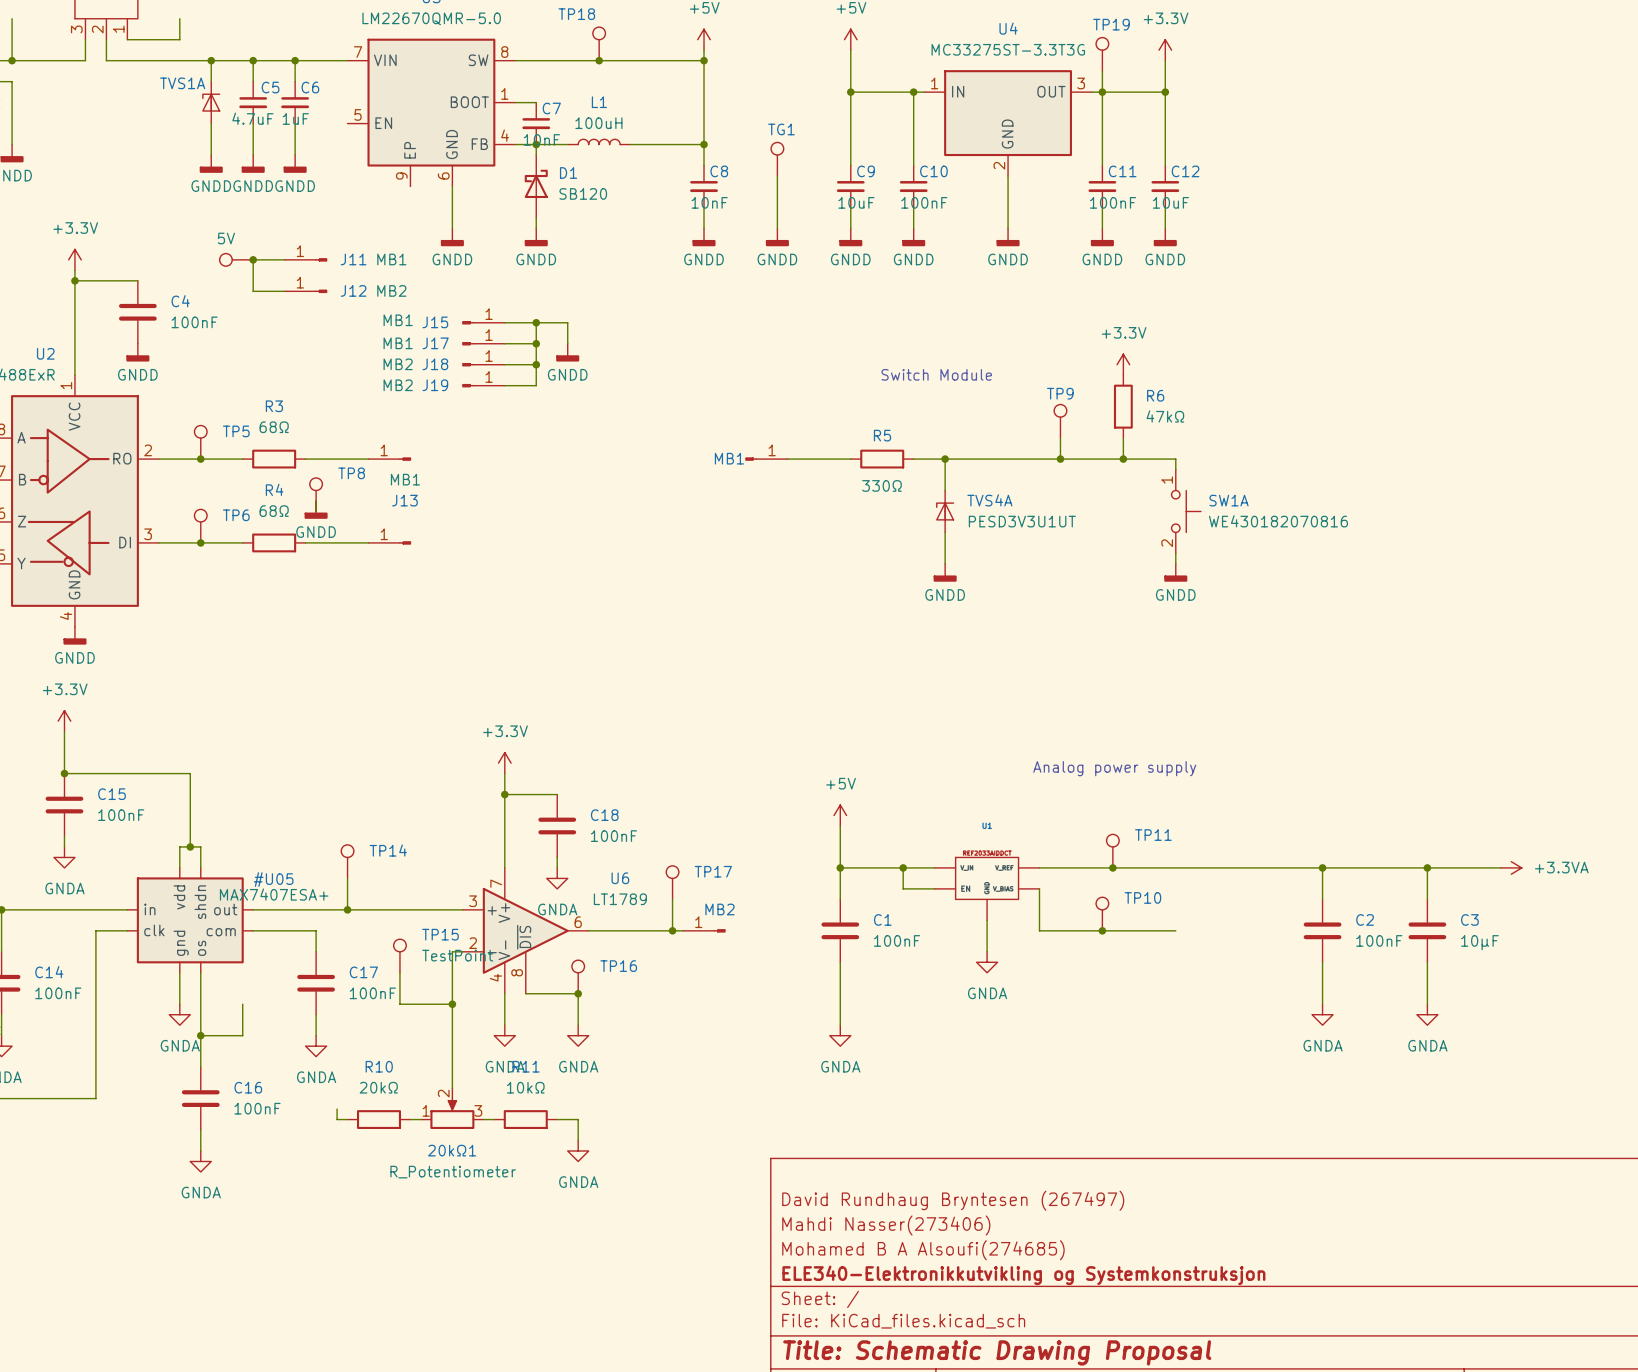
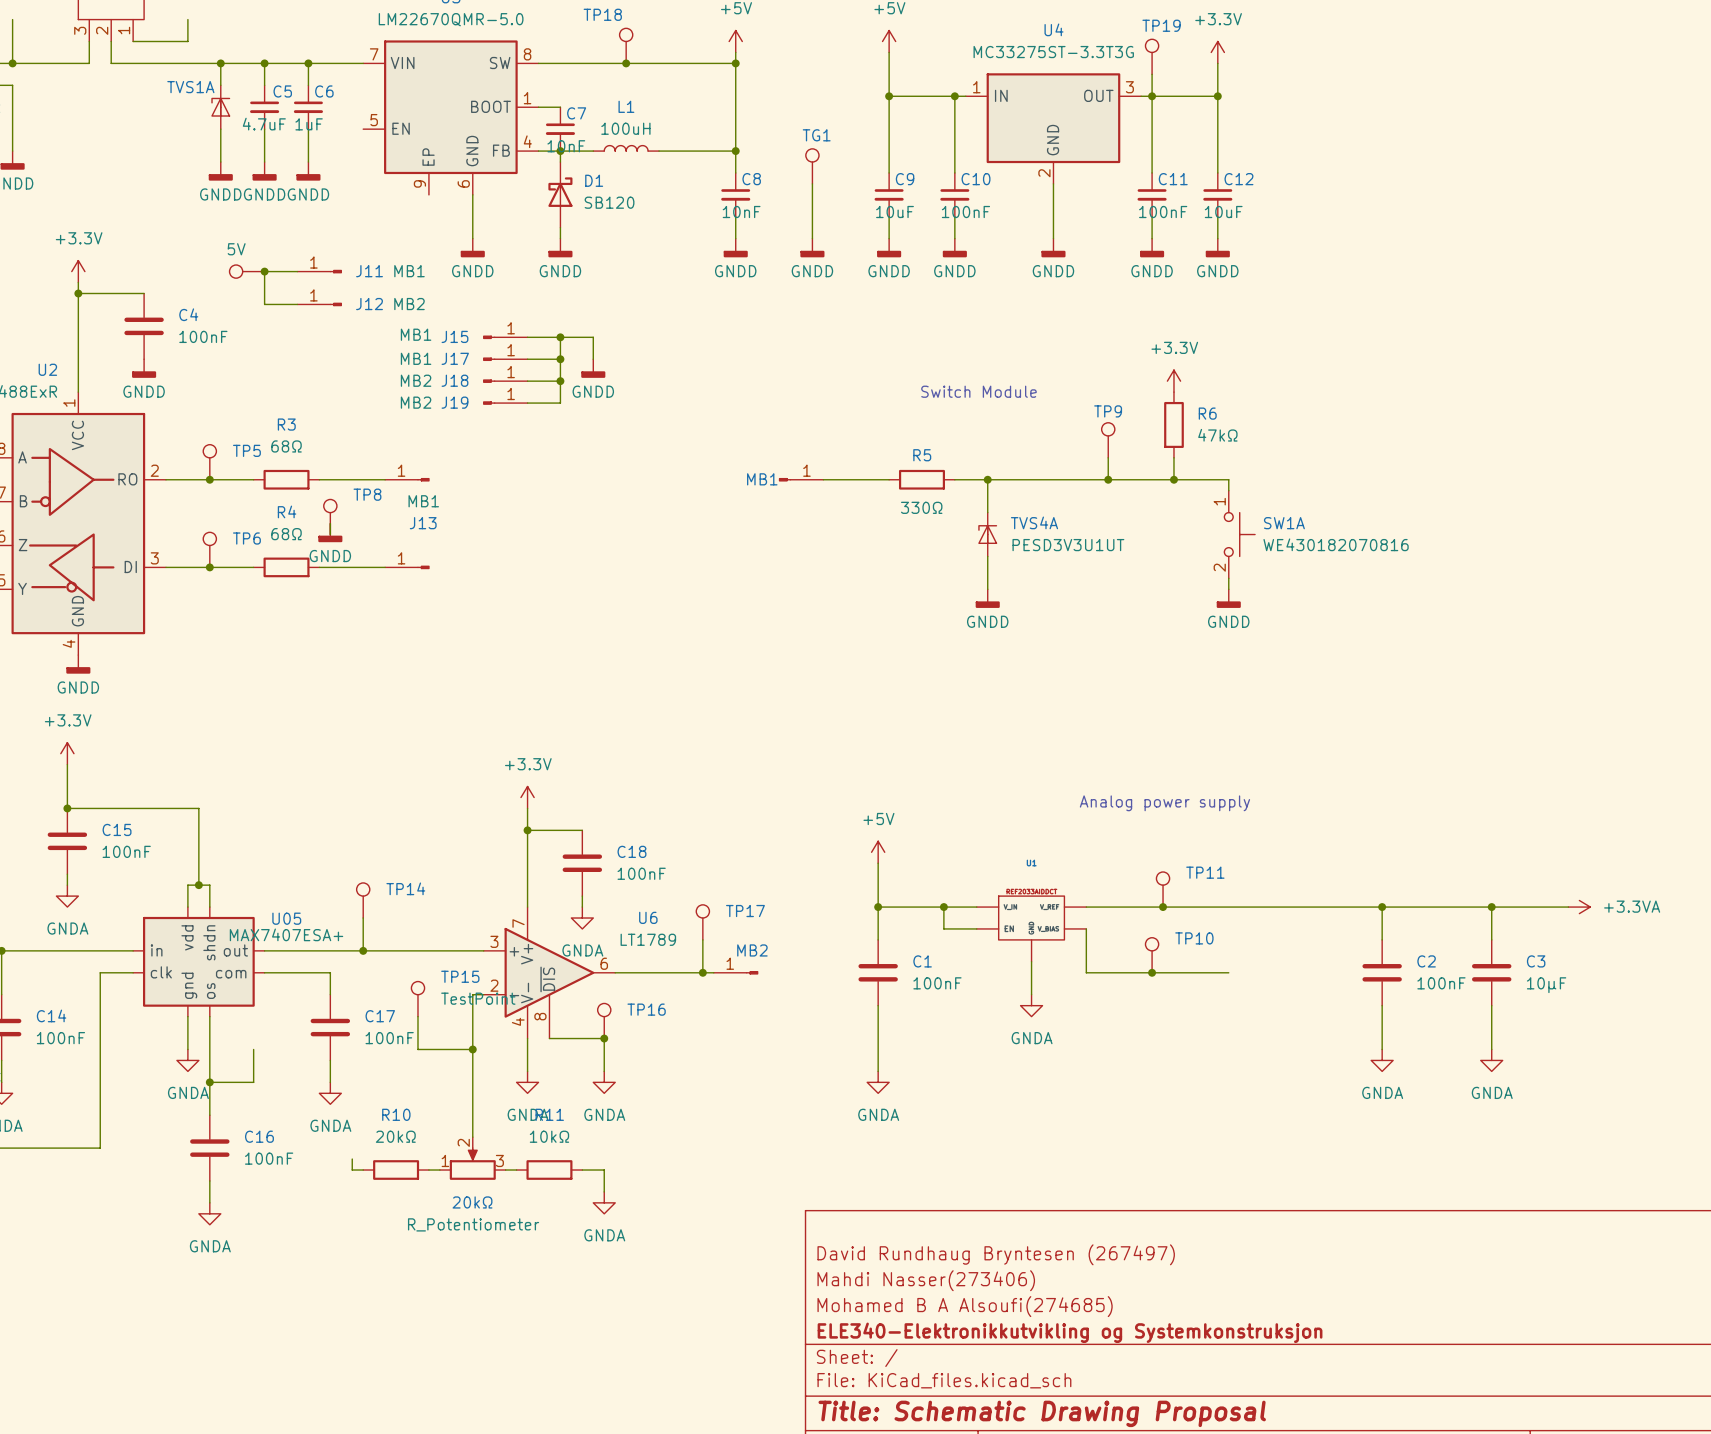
#U05 name: #U05 (273, 879) -> U05 (286, 918)
20kΩ1 name: 20kΩ1 (452, 1150) -> 20kΩ (472, 1202)

